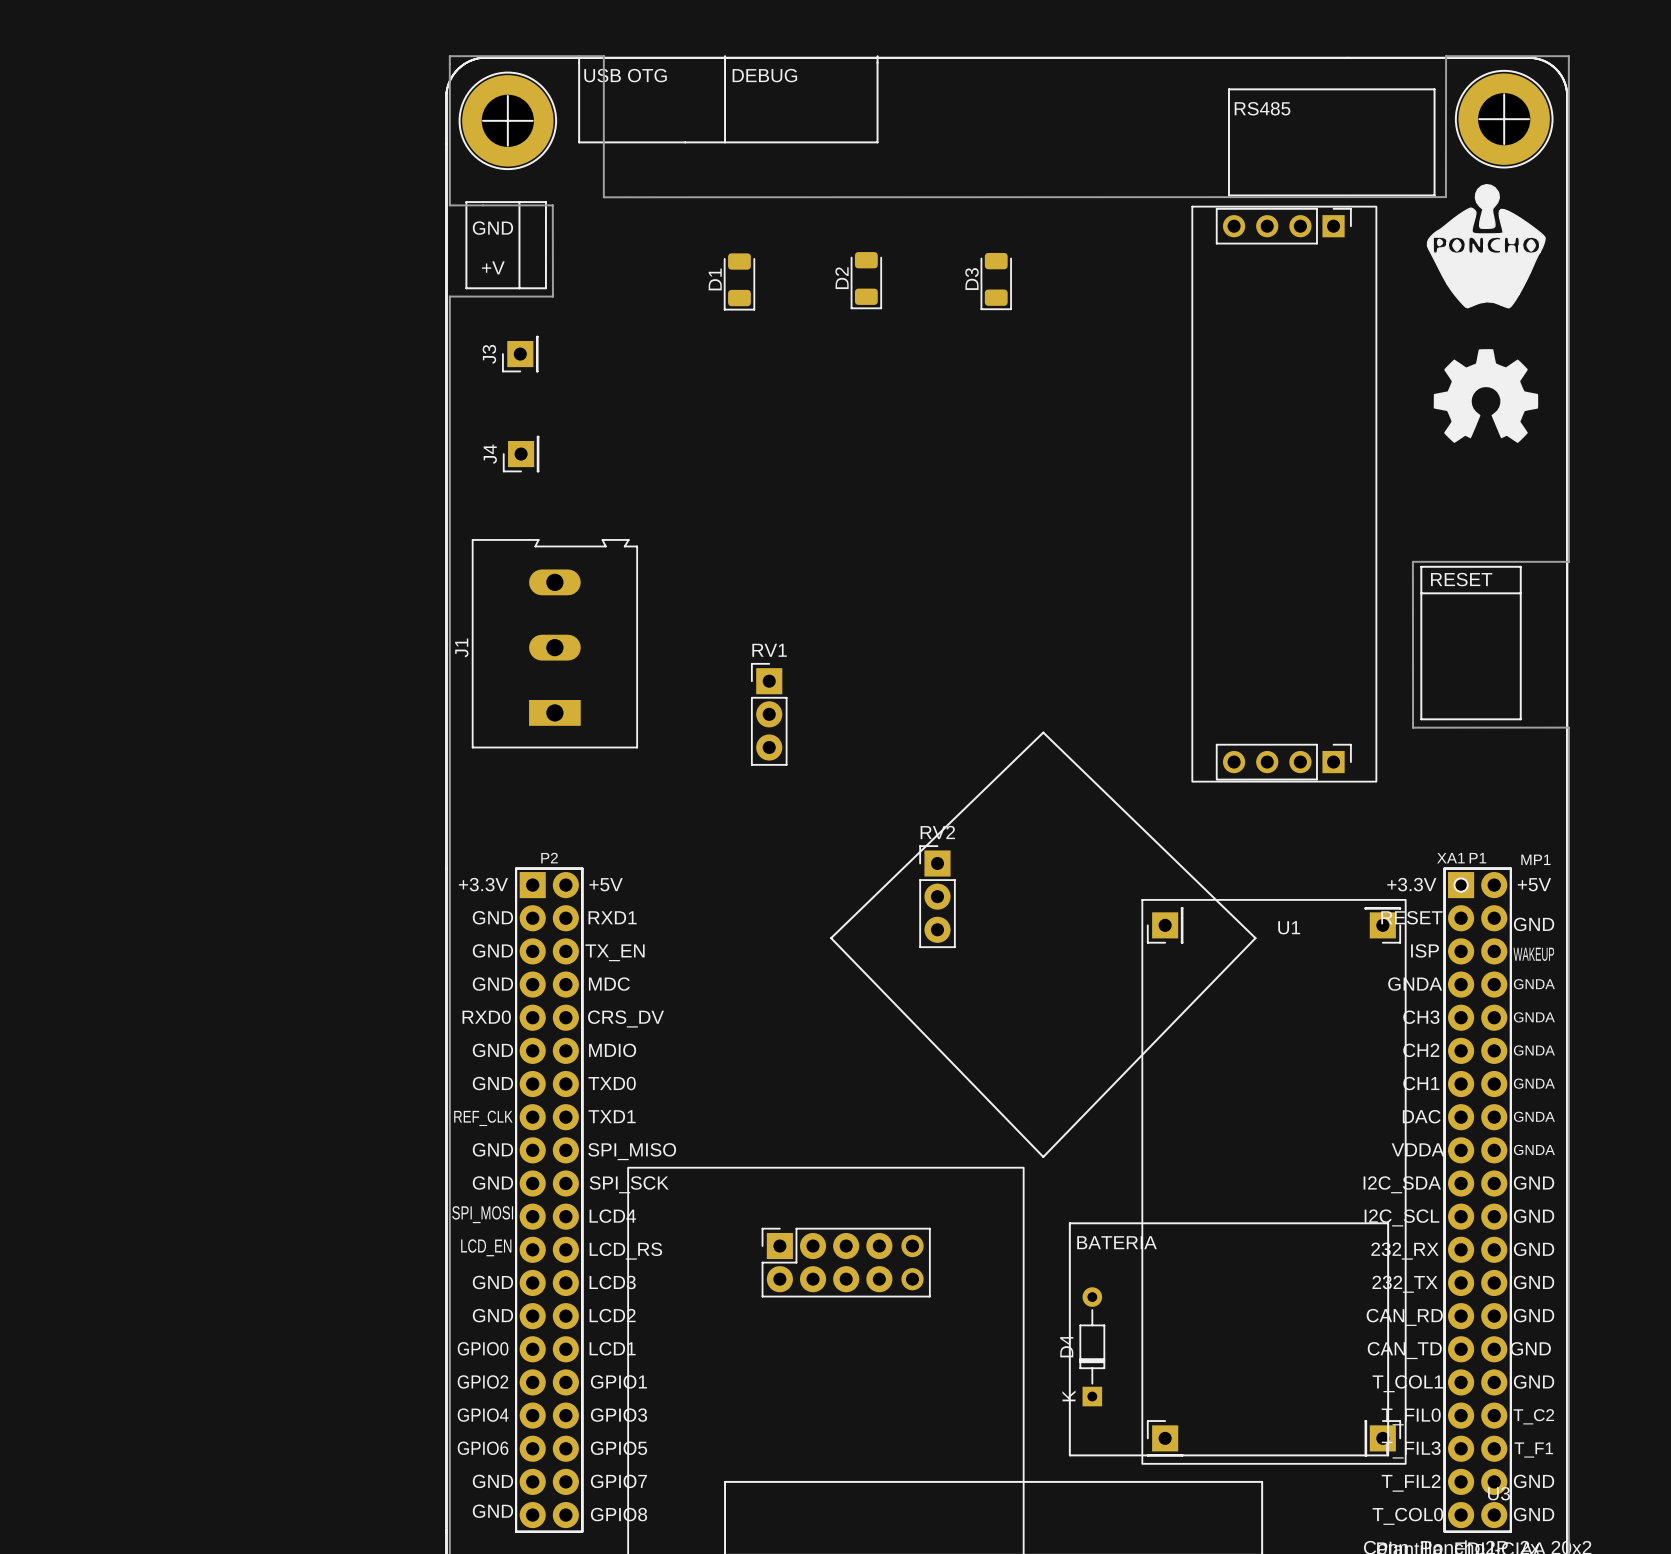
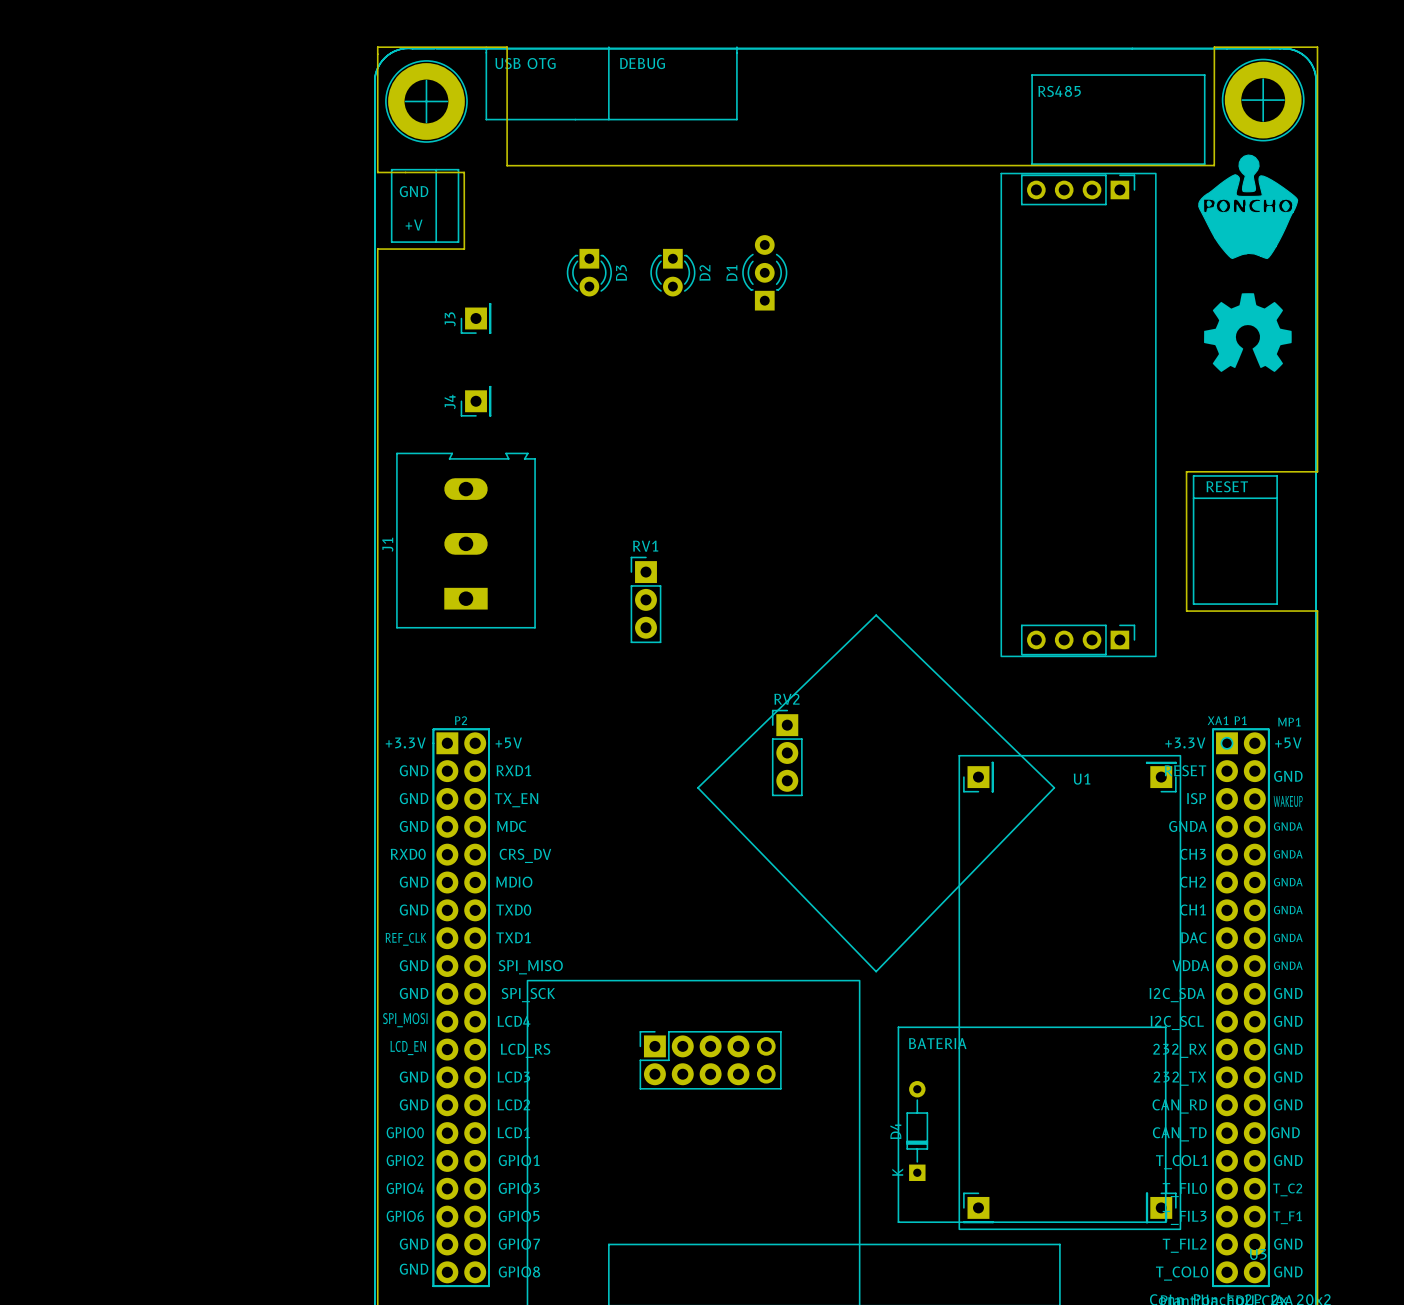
D2 footprint: [850, 252, 882, 310] -> [650, 248, 696, 297]
D3 footprint: [980, 252, 1012, 311] -> [566, 248, 612, 297]
D1 footprint: [723, 253, 756, 311] -> [742, 235, 788, 311]
D2 name position: D2 (842, 278) -> D2 (704, 272)
D3 name position: D3 (971, 279) -> D3 (621, 272)
J3 position: (520, 354) -> (476, 318)
J4 position: (521, 454) -> (476, 401)

